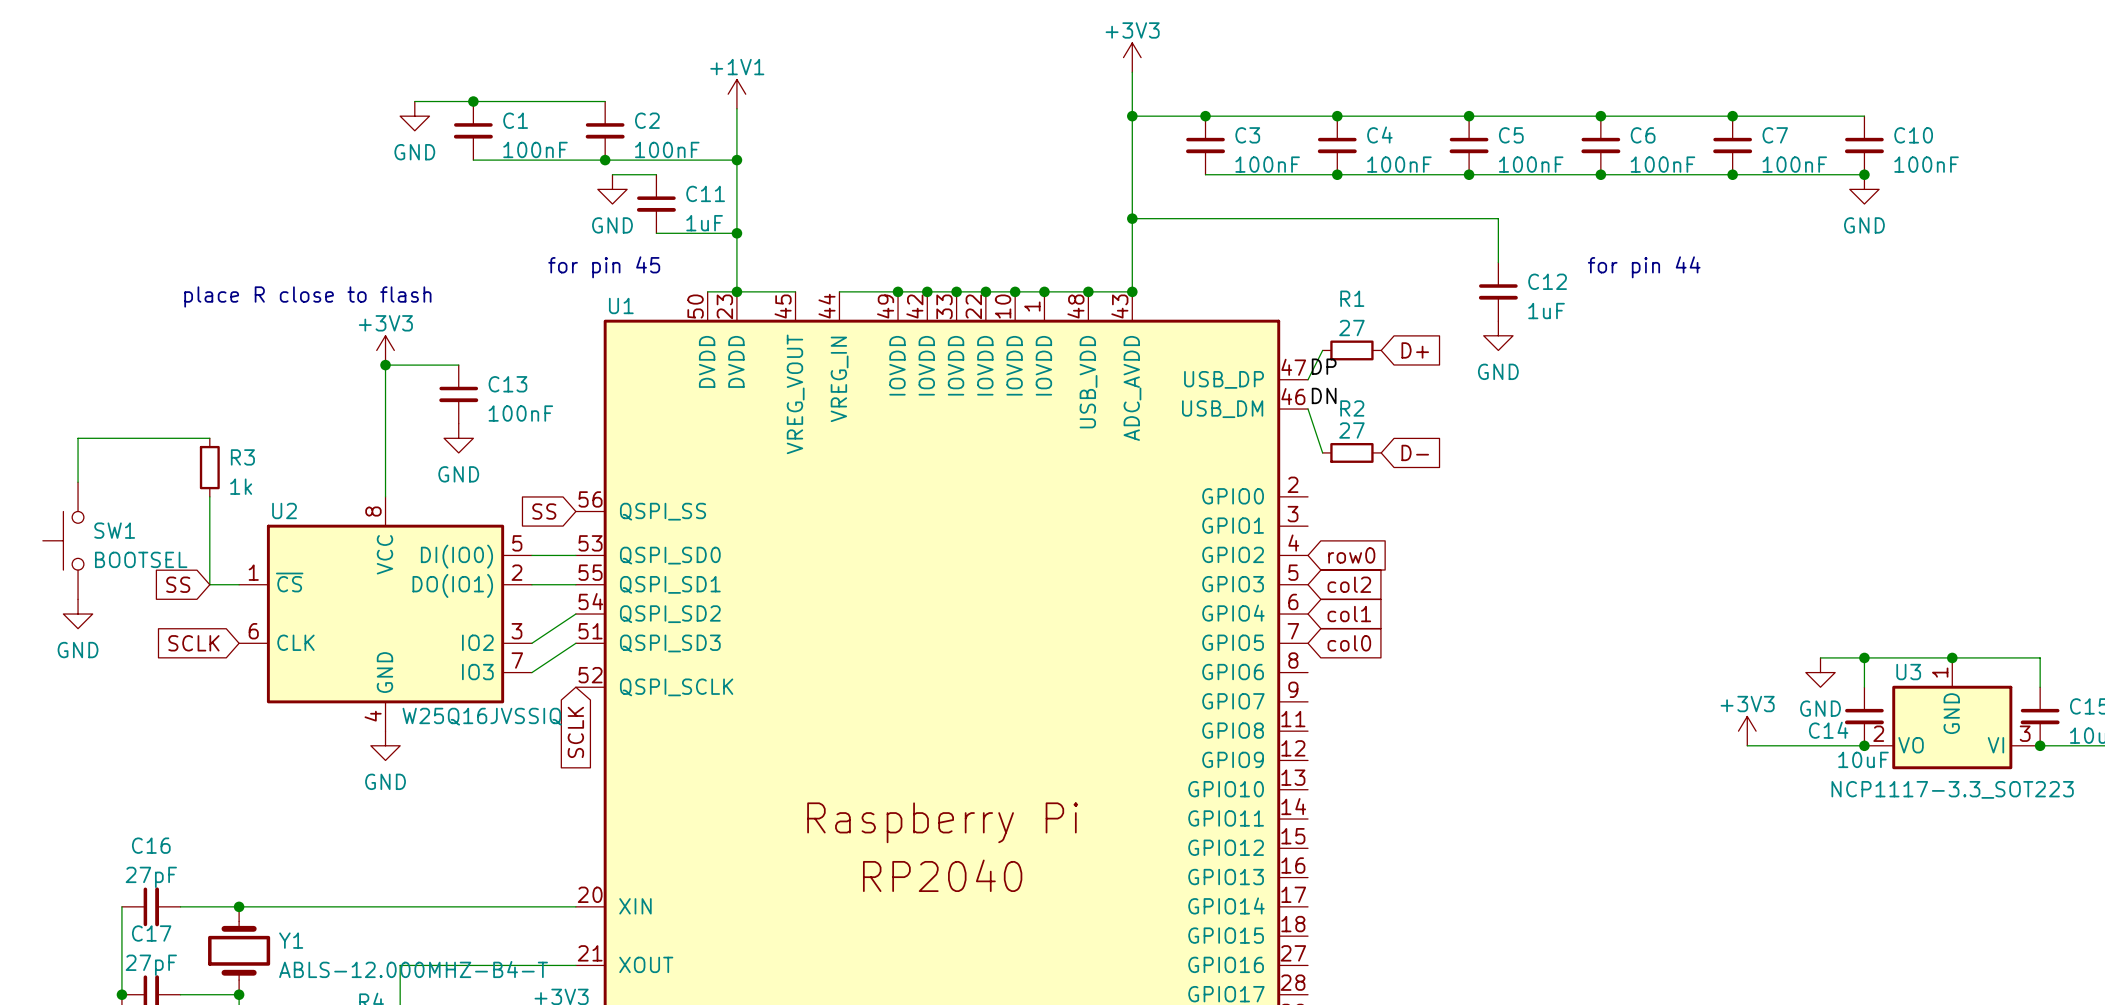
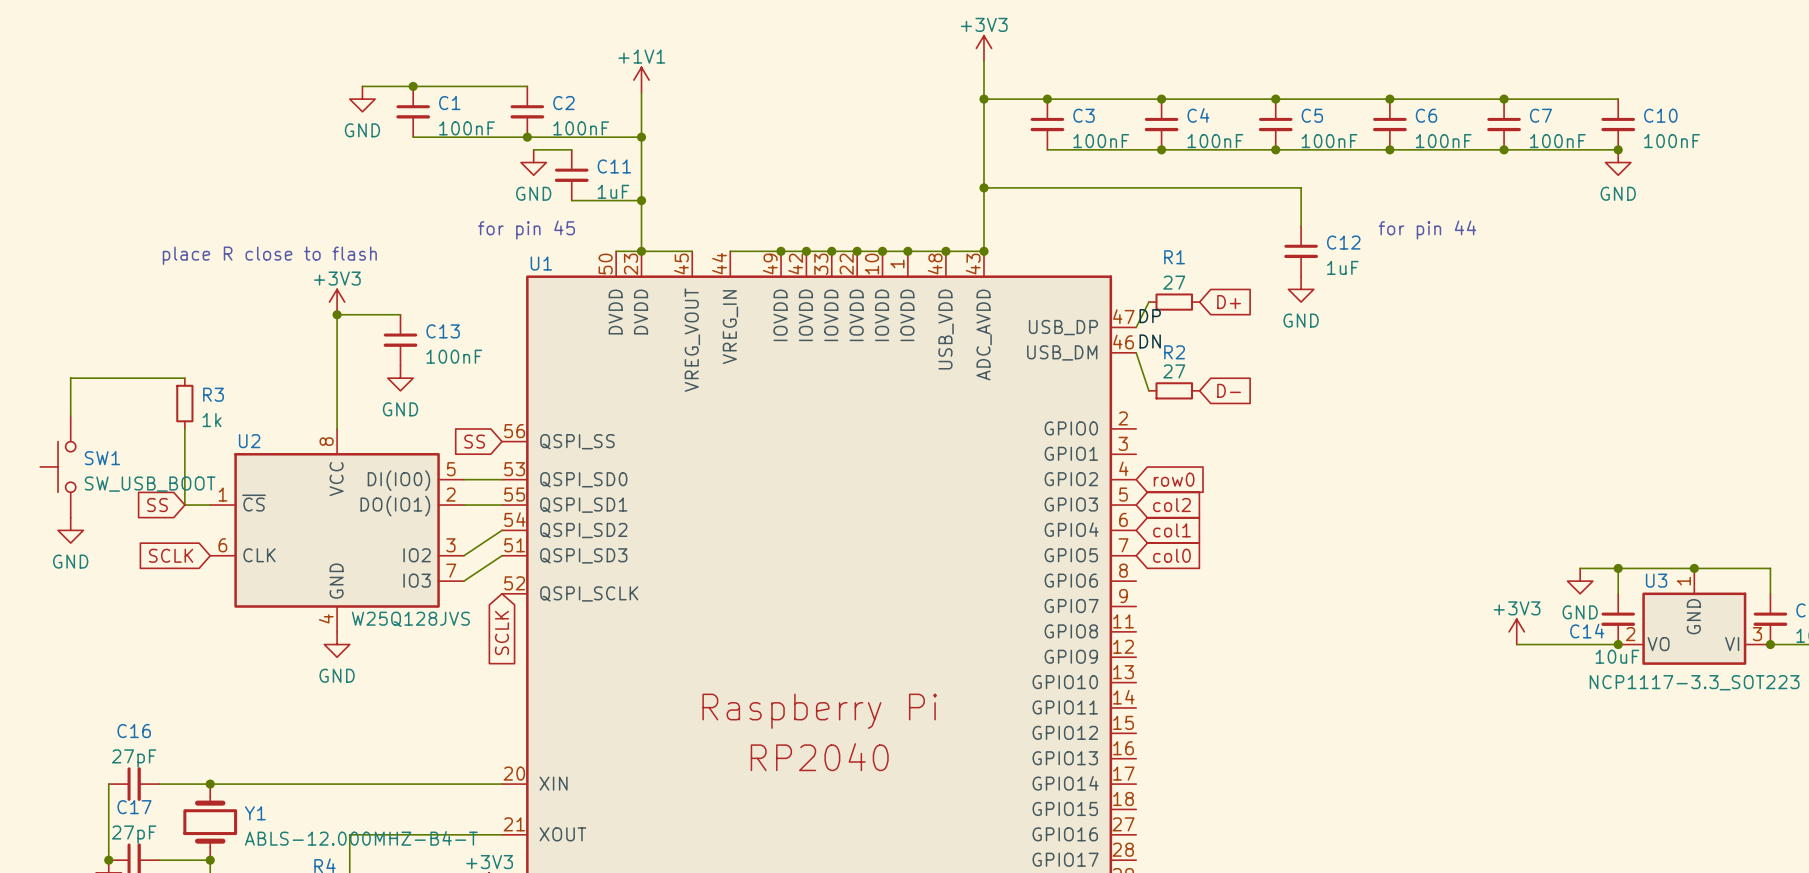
SW1 value: BOOTSEL (141, 559) -> SW_USB_BOOT (150, 484)
U2 value: W25Q16JVSSIQ (482, 716) -> W25Q128JVS (410, 619)

